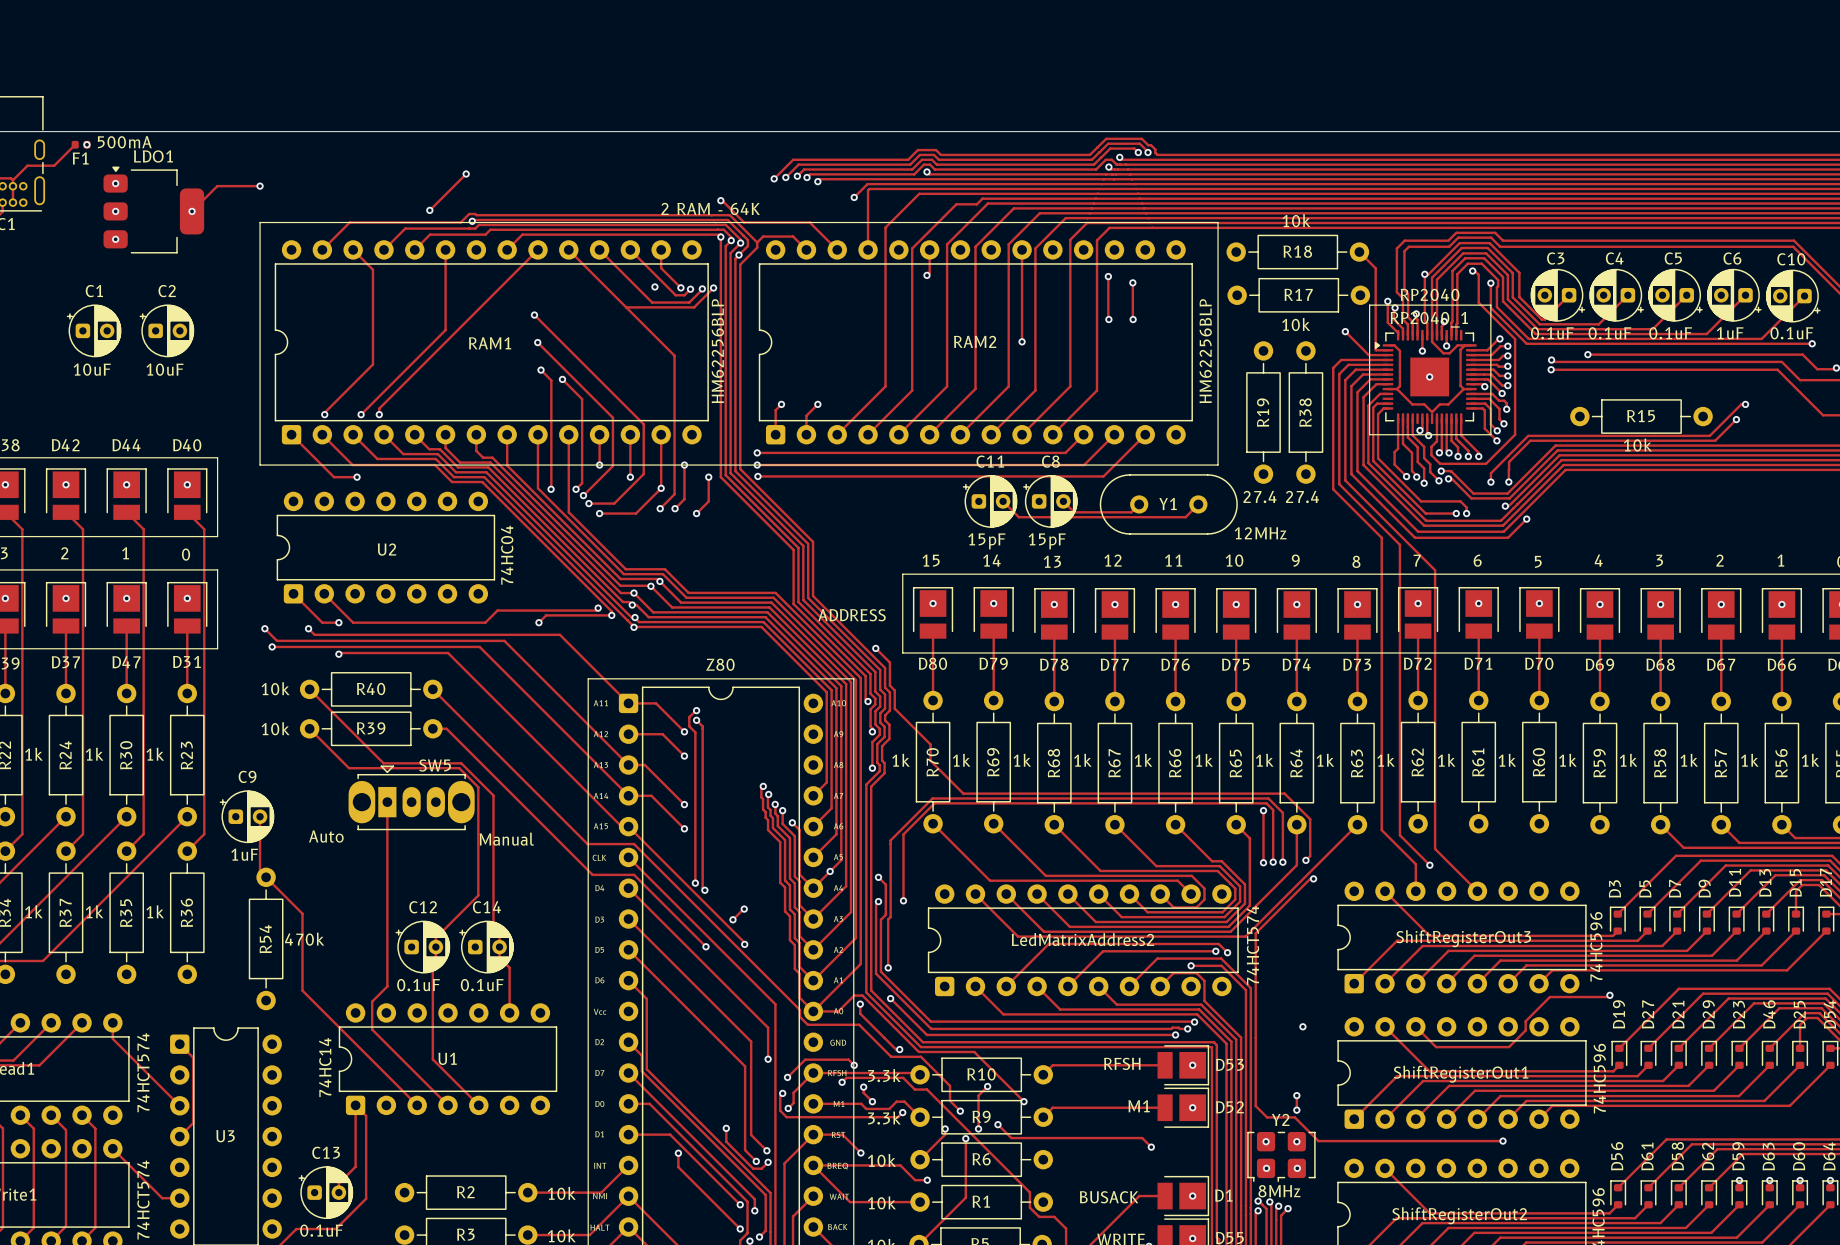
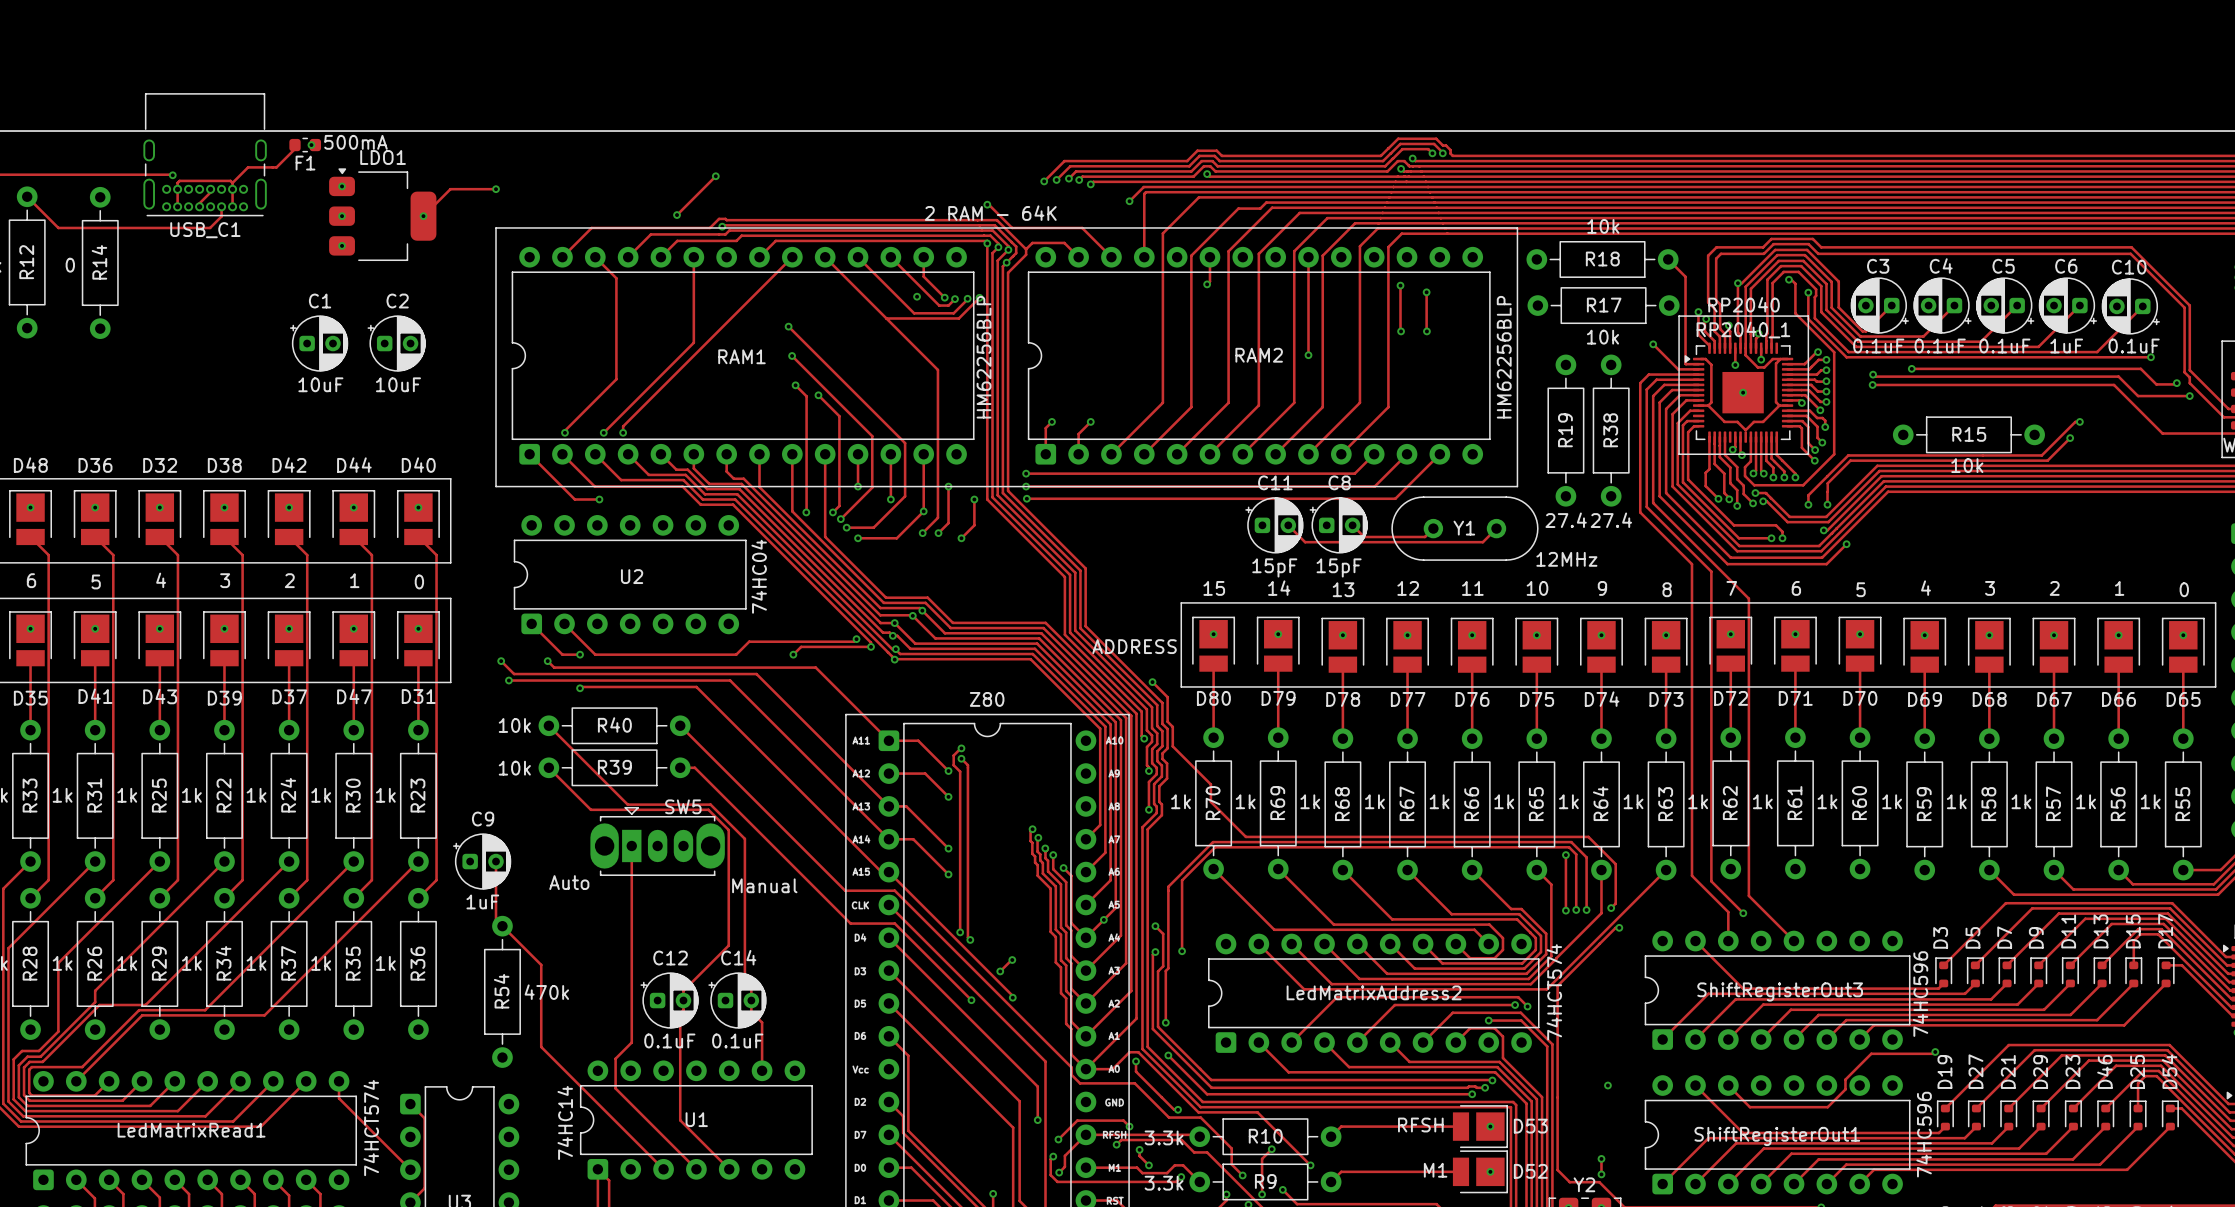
F1 footprint: [71, 140, 91, 149] -> [289, 137, 322, 153]

